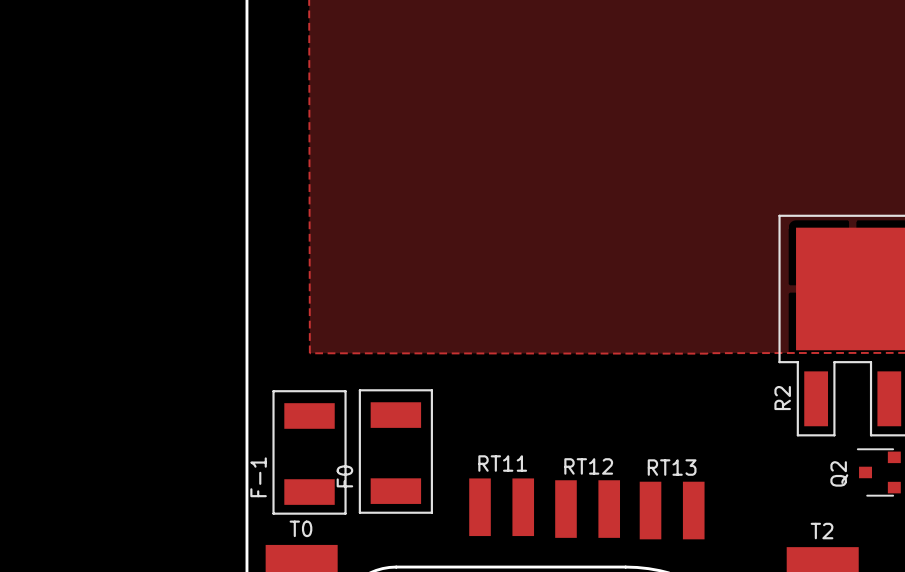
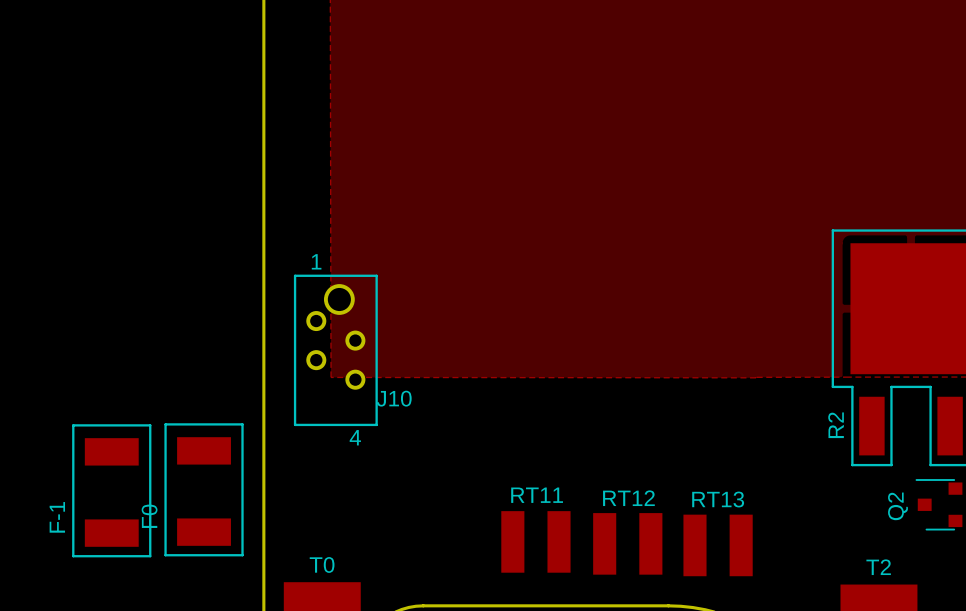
J10: none -> (335, 350)
F0 position: (395, 451) -> (204, 489)
F-1 position: (309, 452) -> (111, 490)

